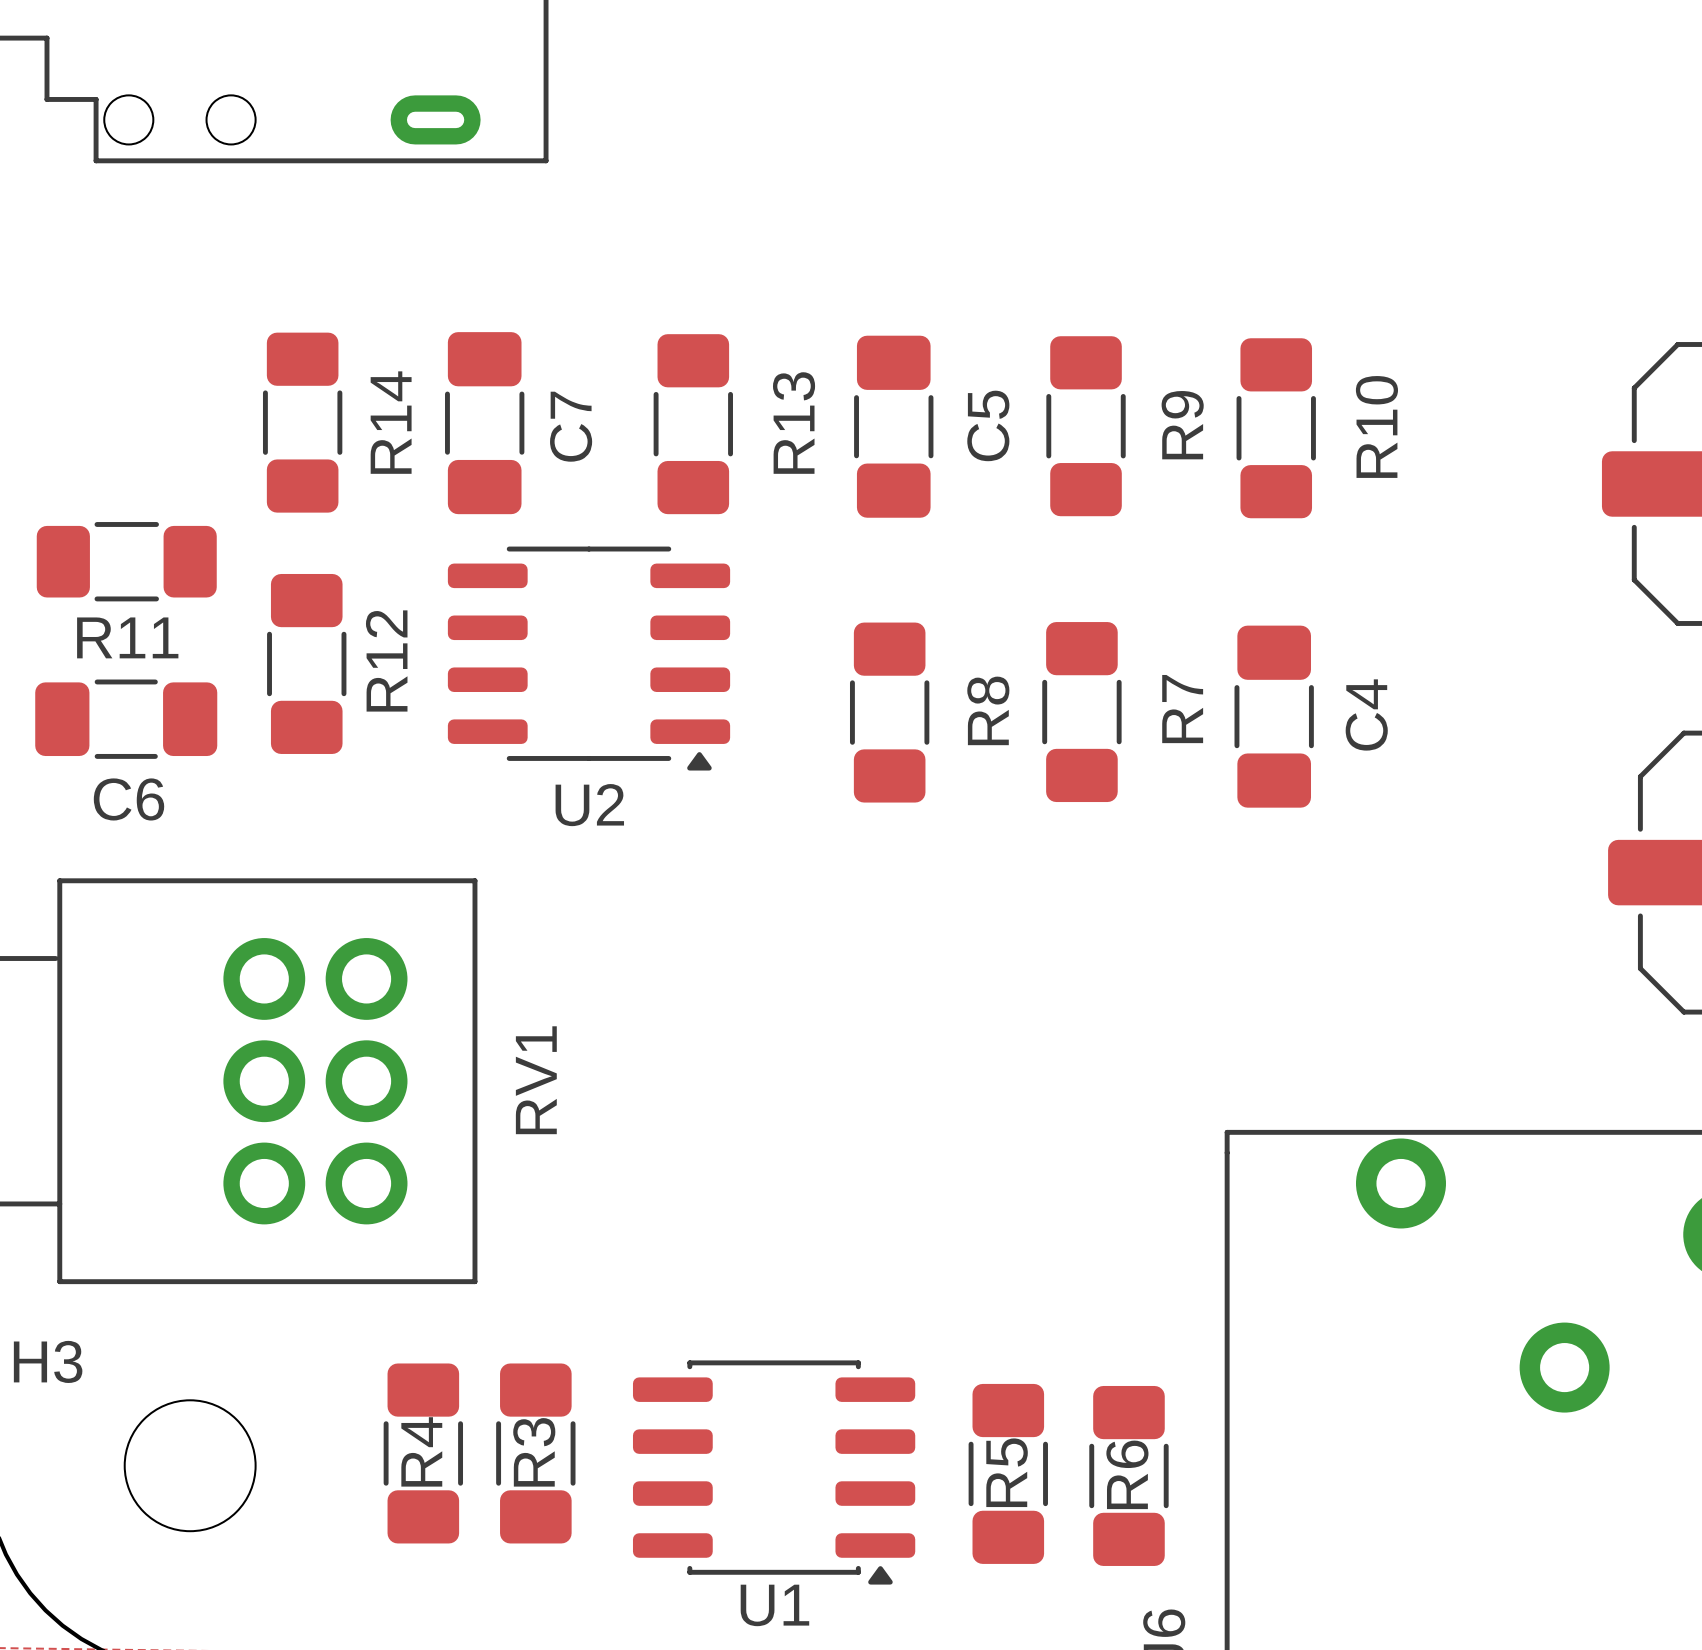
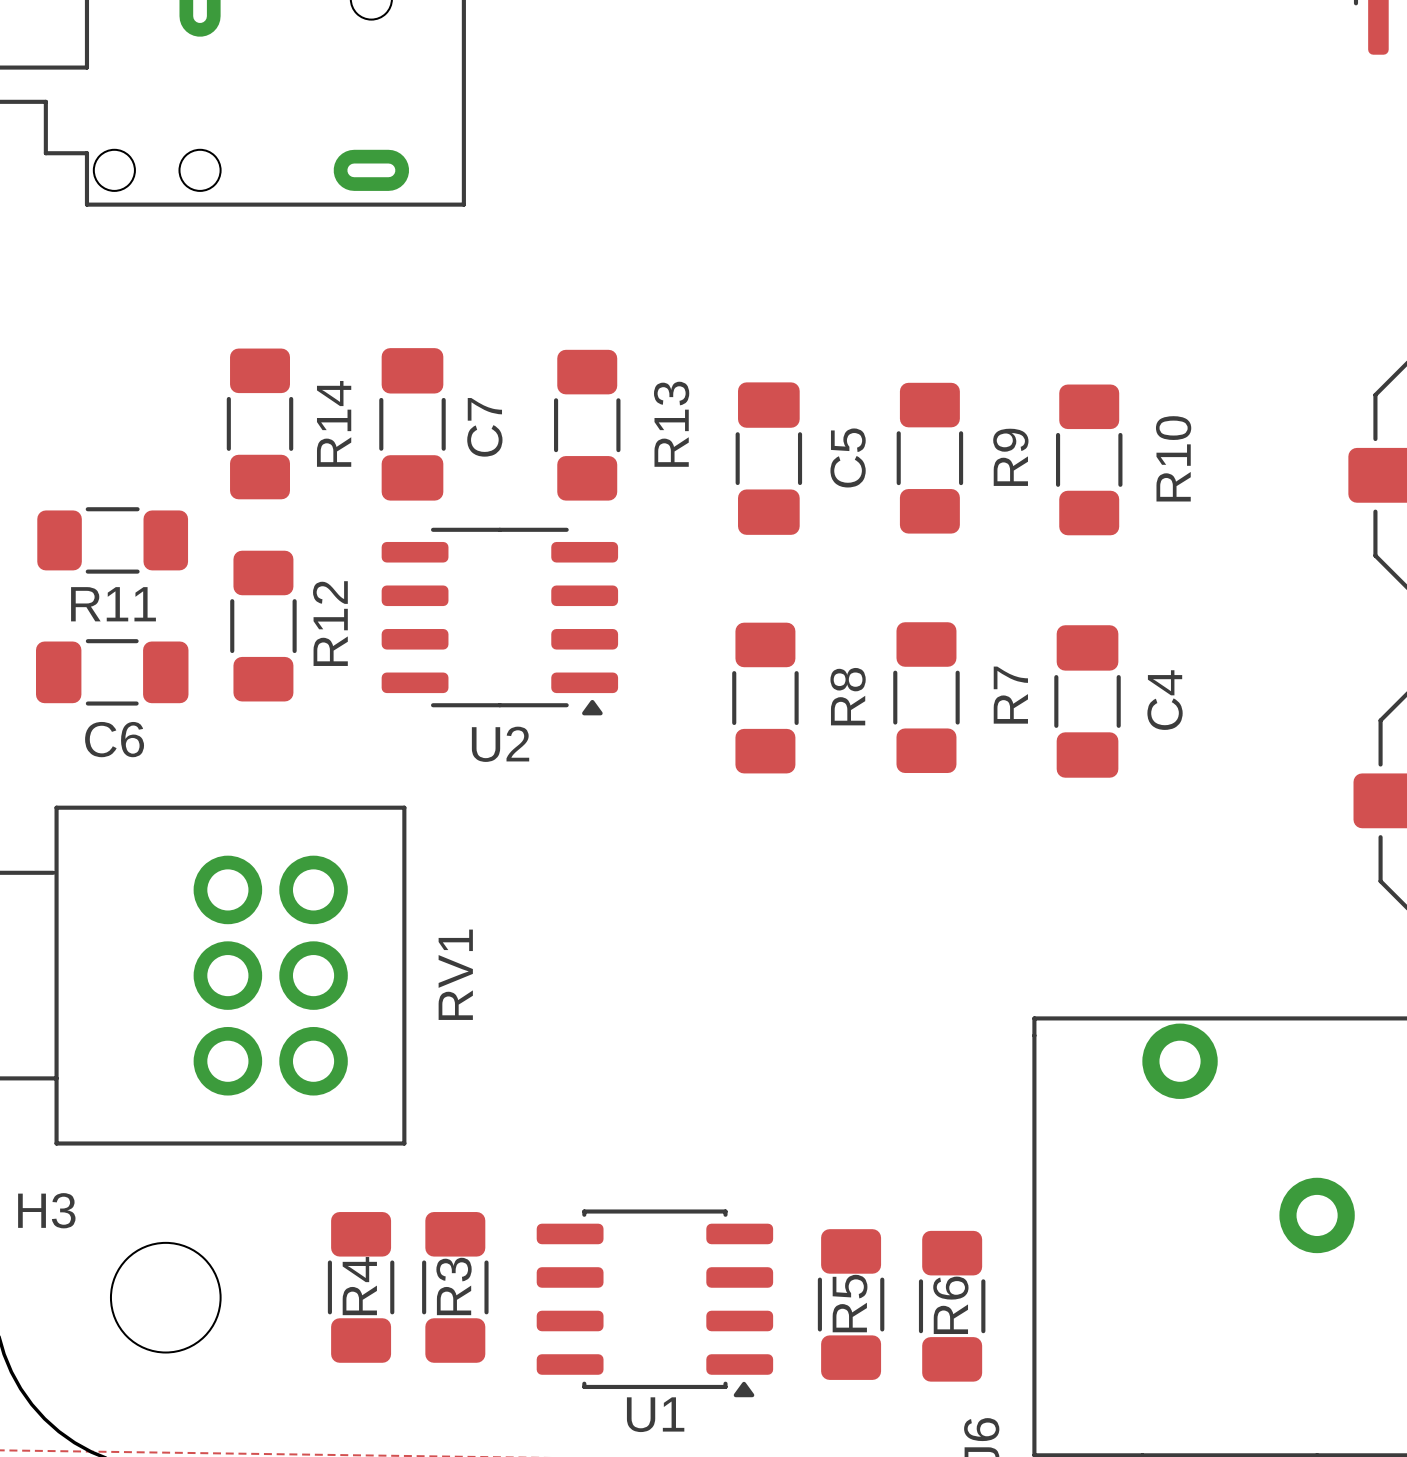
C5 position: (893, 426) -> (768, 458)
R9 position: (1086, 426) -> (929, 458)
R10 position: (1276, 428) -> (1089, 459)
R8 position: (889, 712) -> (765, 698)
R7 position: (1081, 712) -> (926, 697)
C4 position: (1274, 716) -> (1087, 701)

